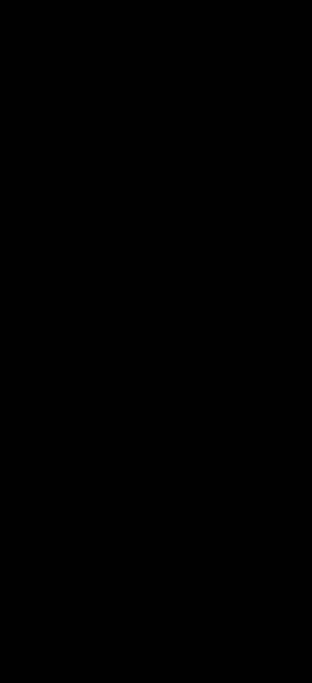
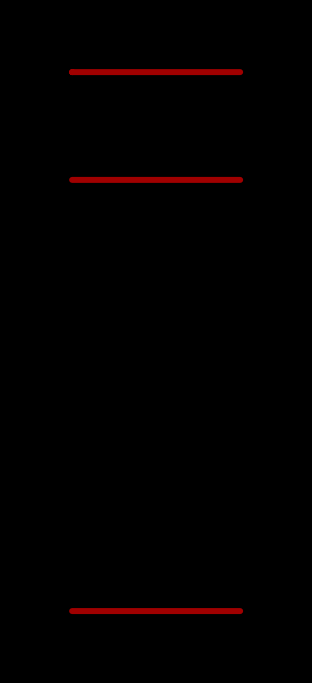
top track: none -> (72, 72) (240, 72)
top track: none -> (72, 179) (240, 179)
top track: none -> (72, 611) (240, 611)

